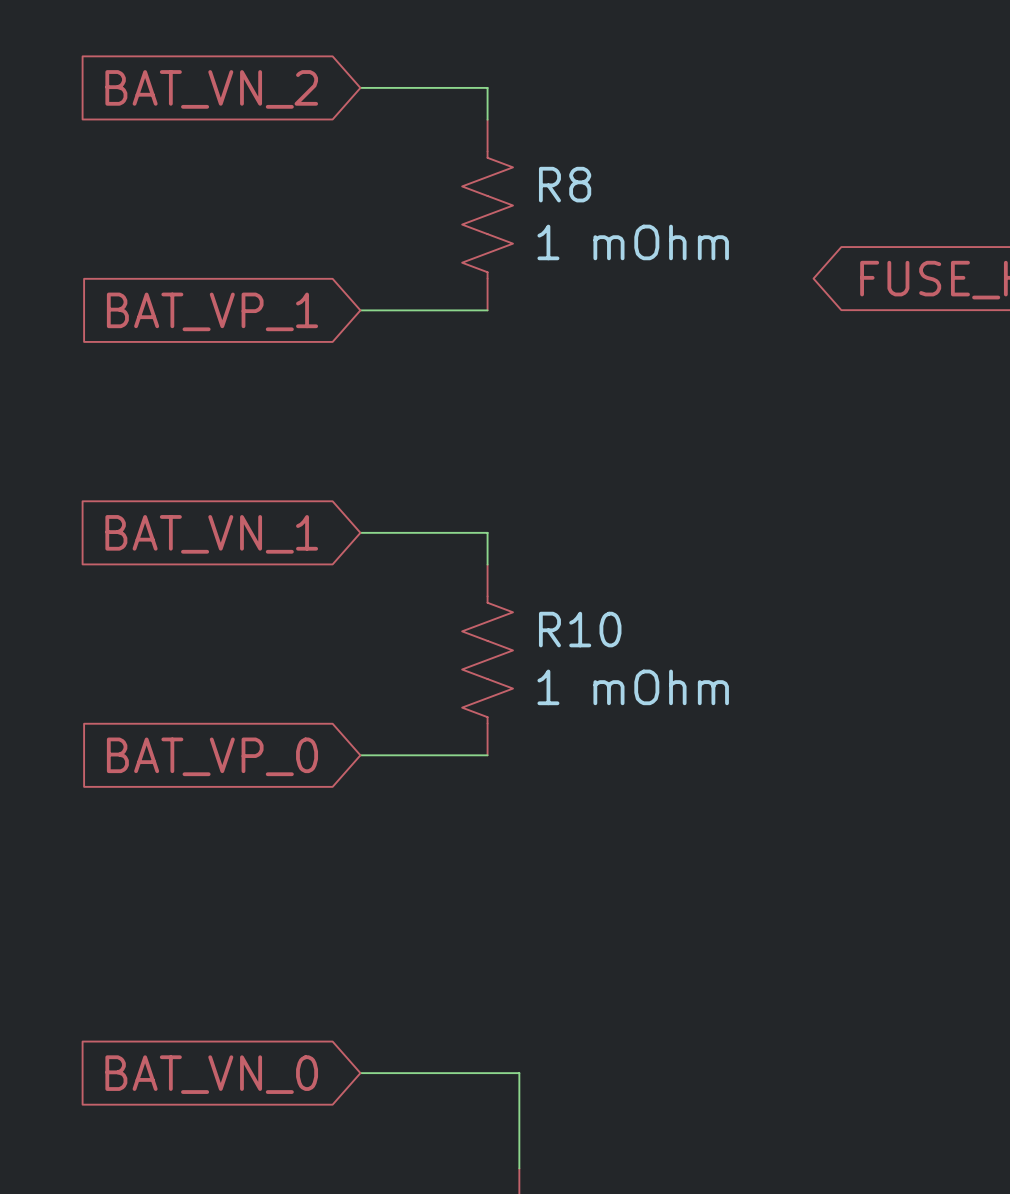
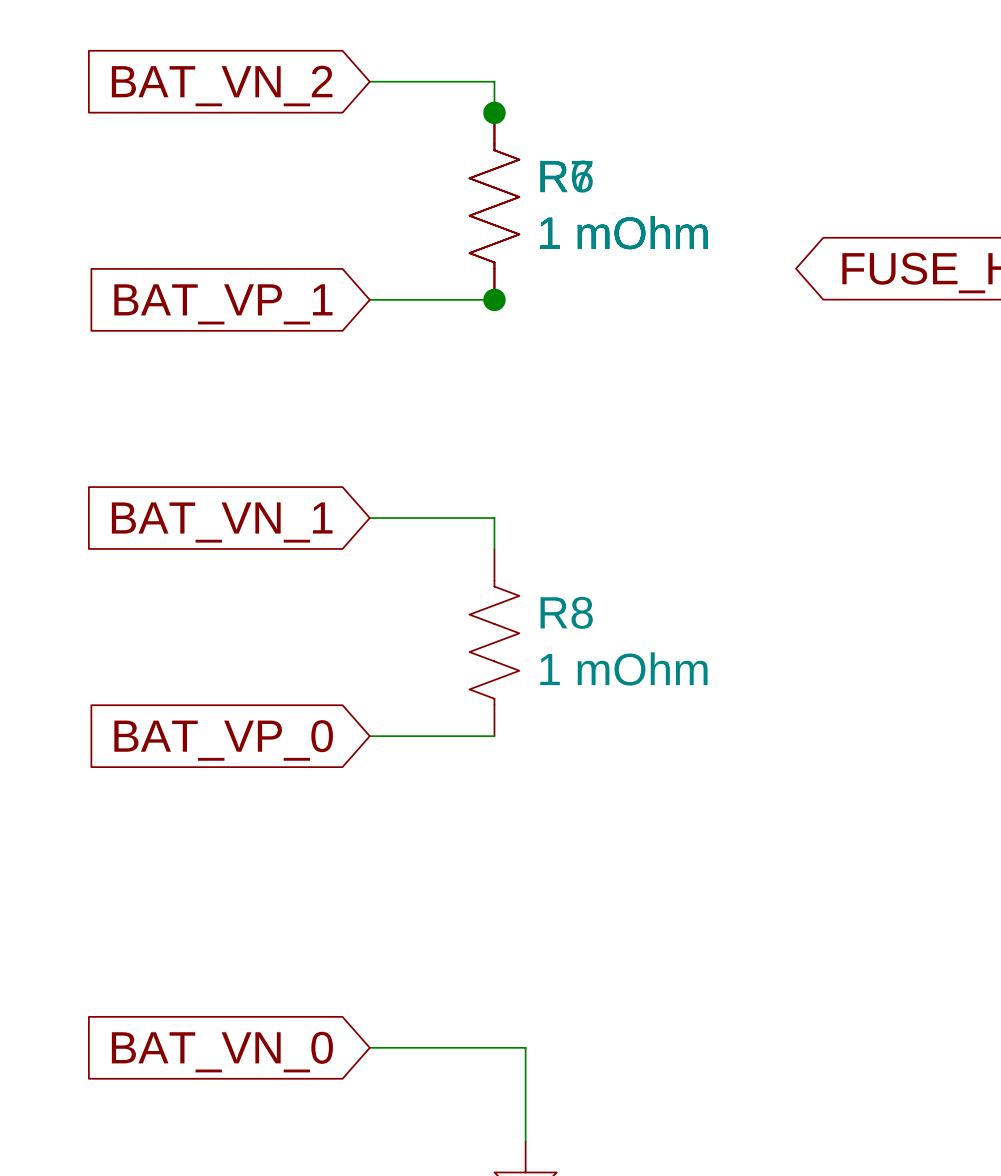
junction: none -> (494, 112)
R8: 1 mOhm (487, 215) -> none
part: none -> 1 mOhm (494, 206)
part: none -> 1 mOhm (494, 206)
junction: none -> (494, 299)
R10 name: R10 (580, 629) -> R8 (566, 612)

